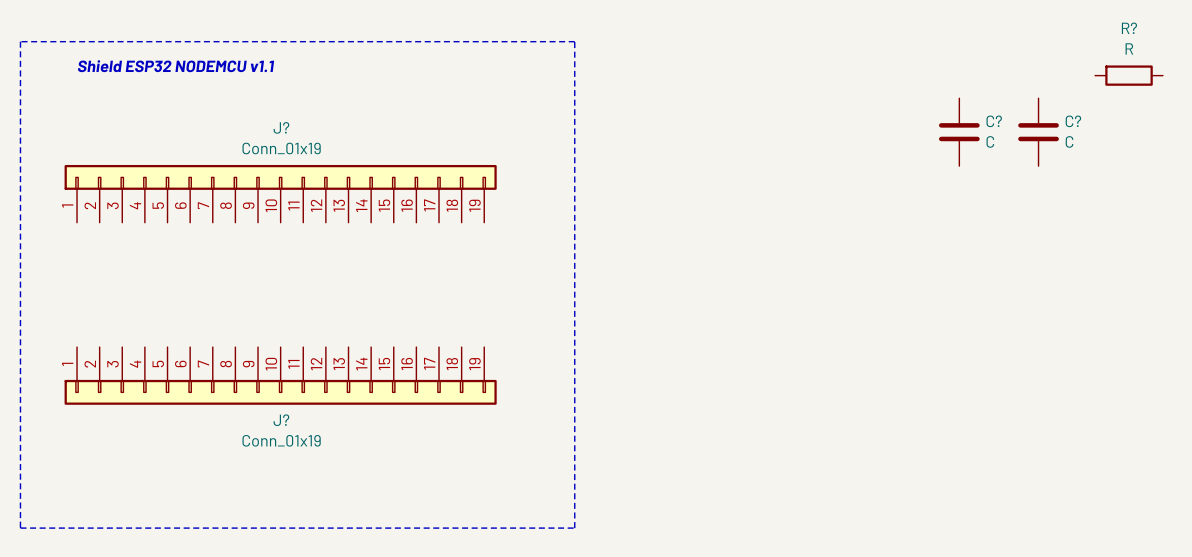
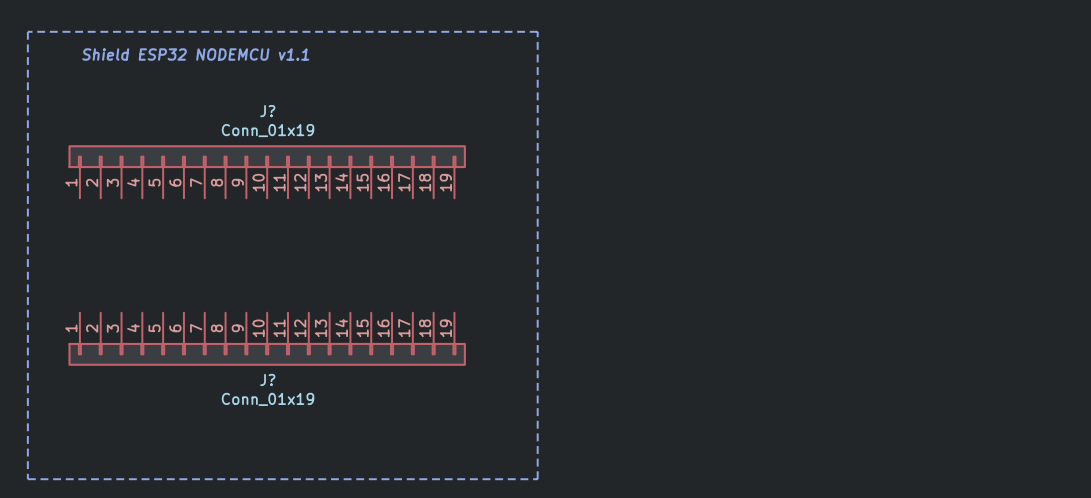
R?: R (1129, 75) -> none
C?: C (959, 132) -> none
C?: C (1038, 132) -> none

